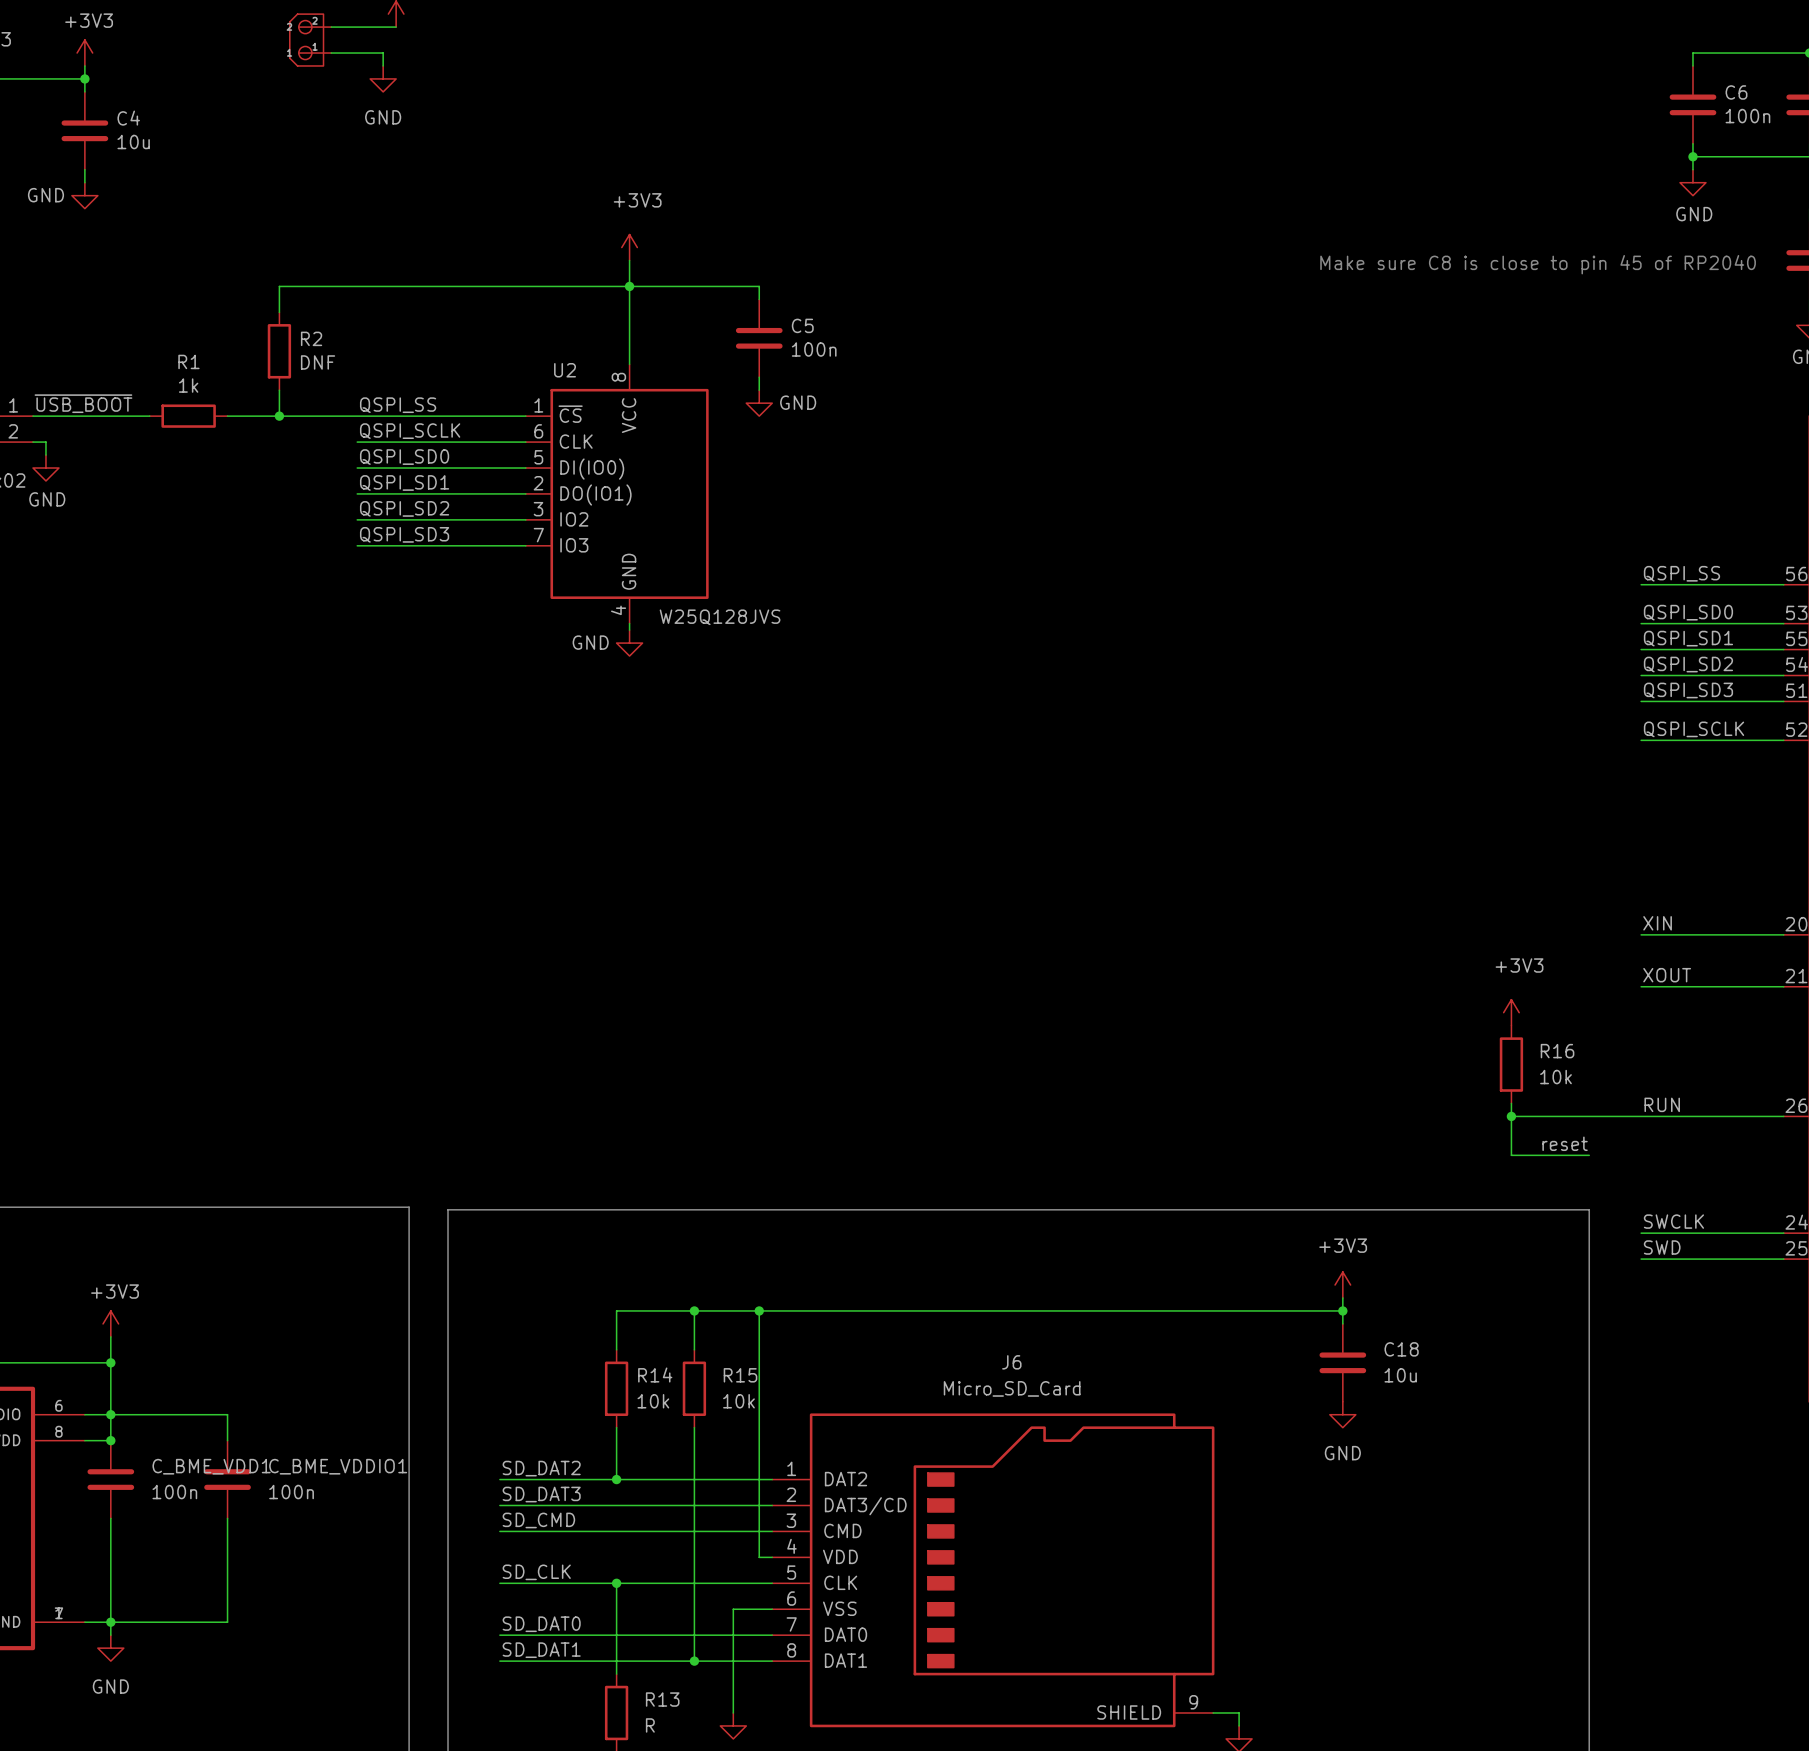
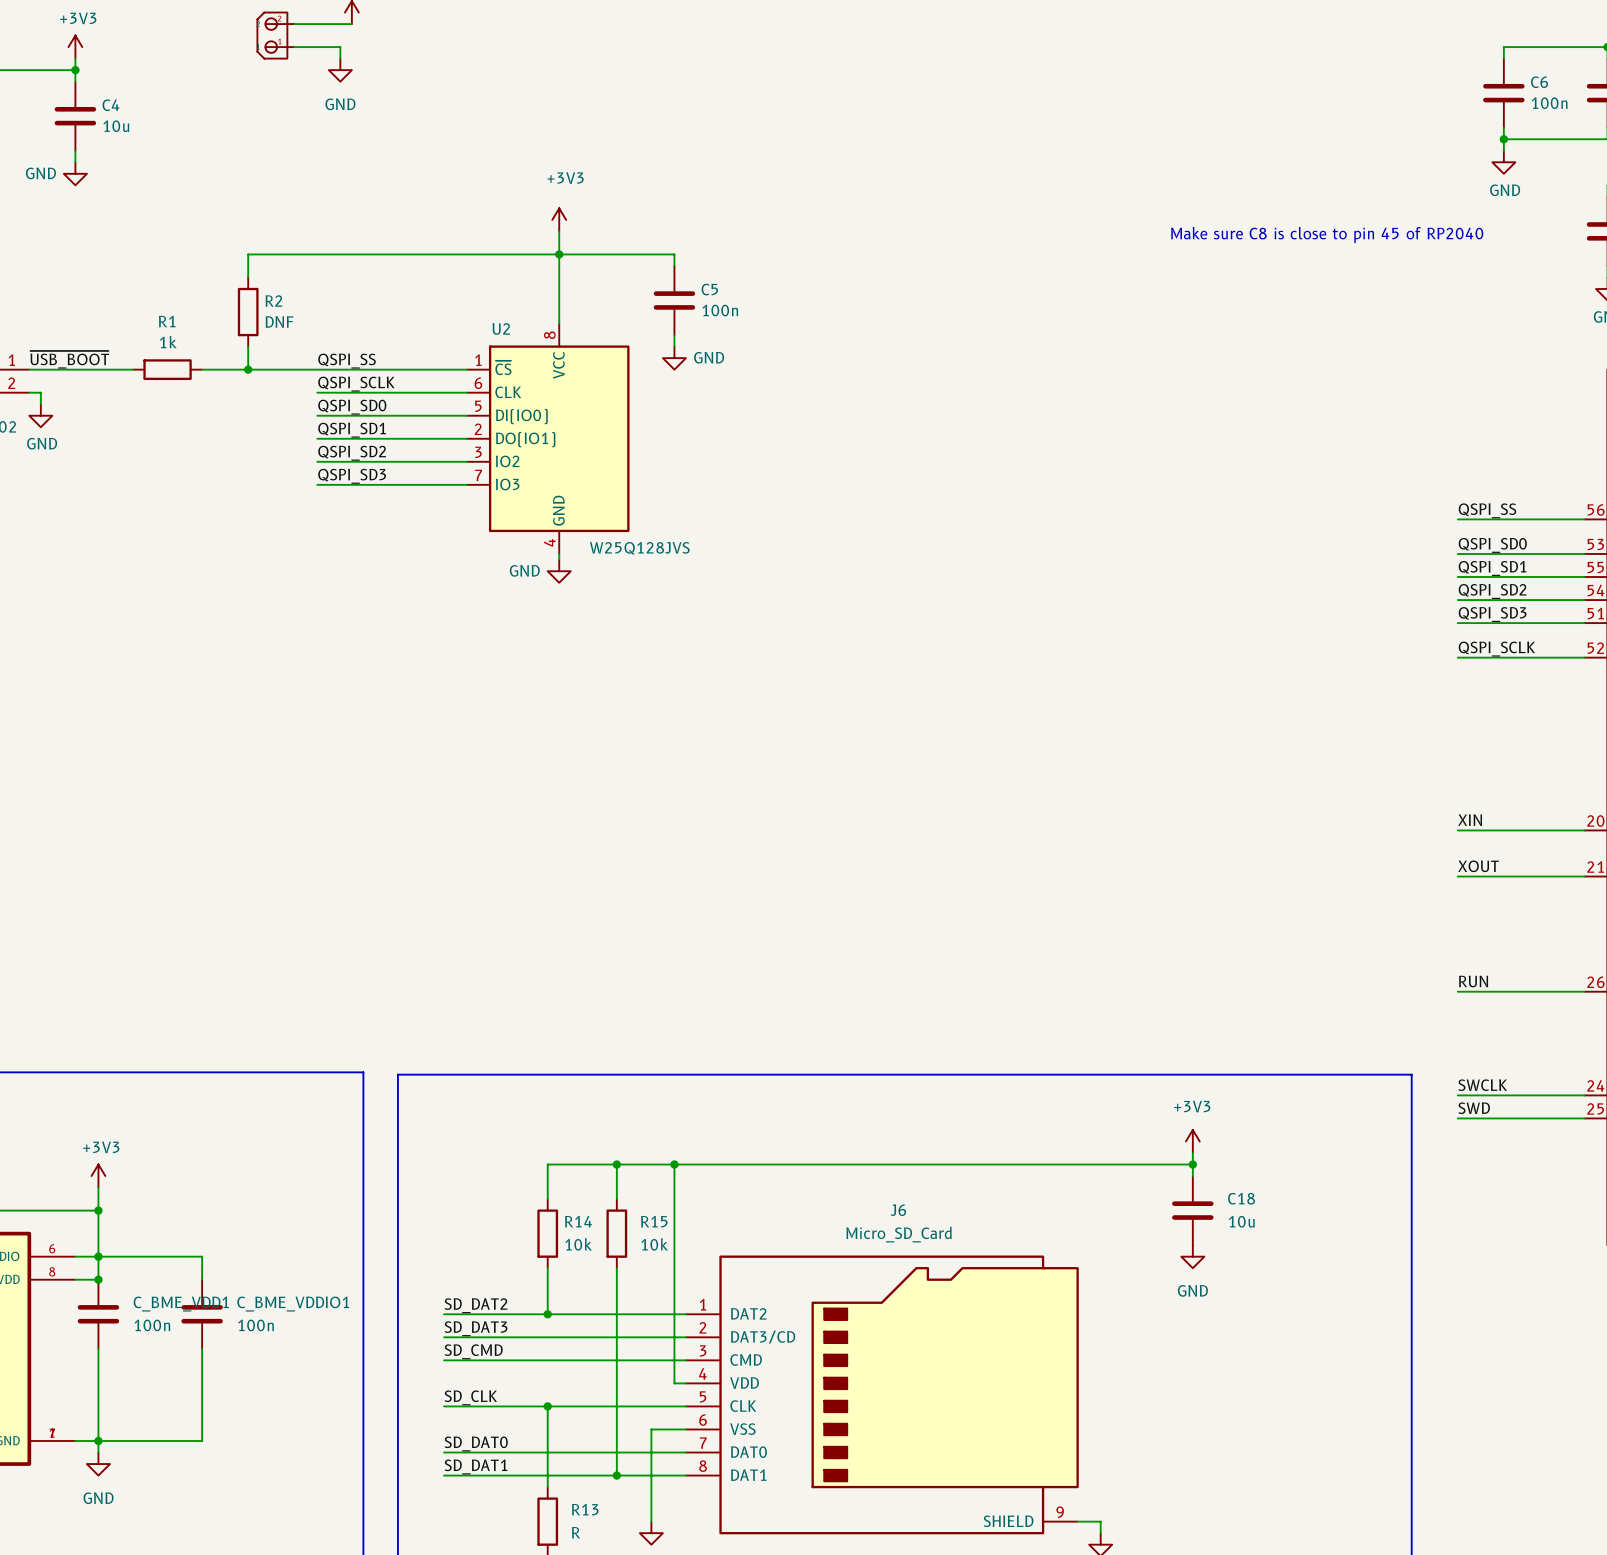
power symbol: +3V3 (1511, 1012) -> none
R16: 10k (1511, 1064) -> none
wire: (1511, 1103) (1511, 1155) (1589, 1155) -> none
wire: (1511, 1116) (1641, 1116) -> none
junction: (1511, 1116) -> none
label: reset (1565, 1143) -> none

